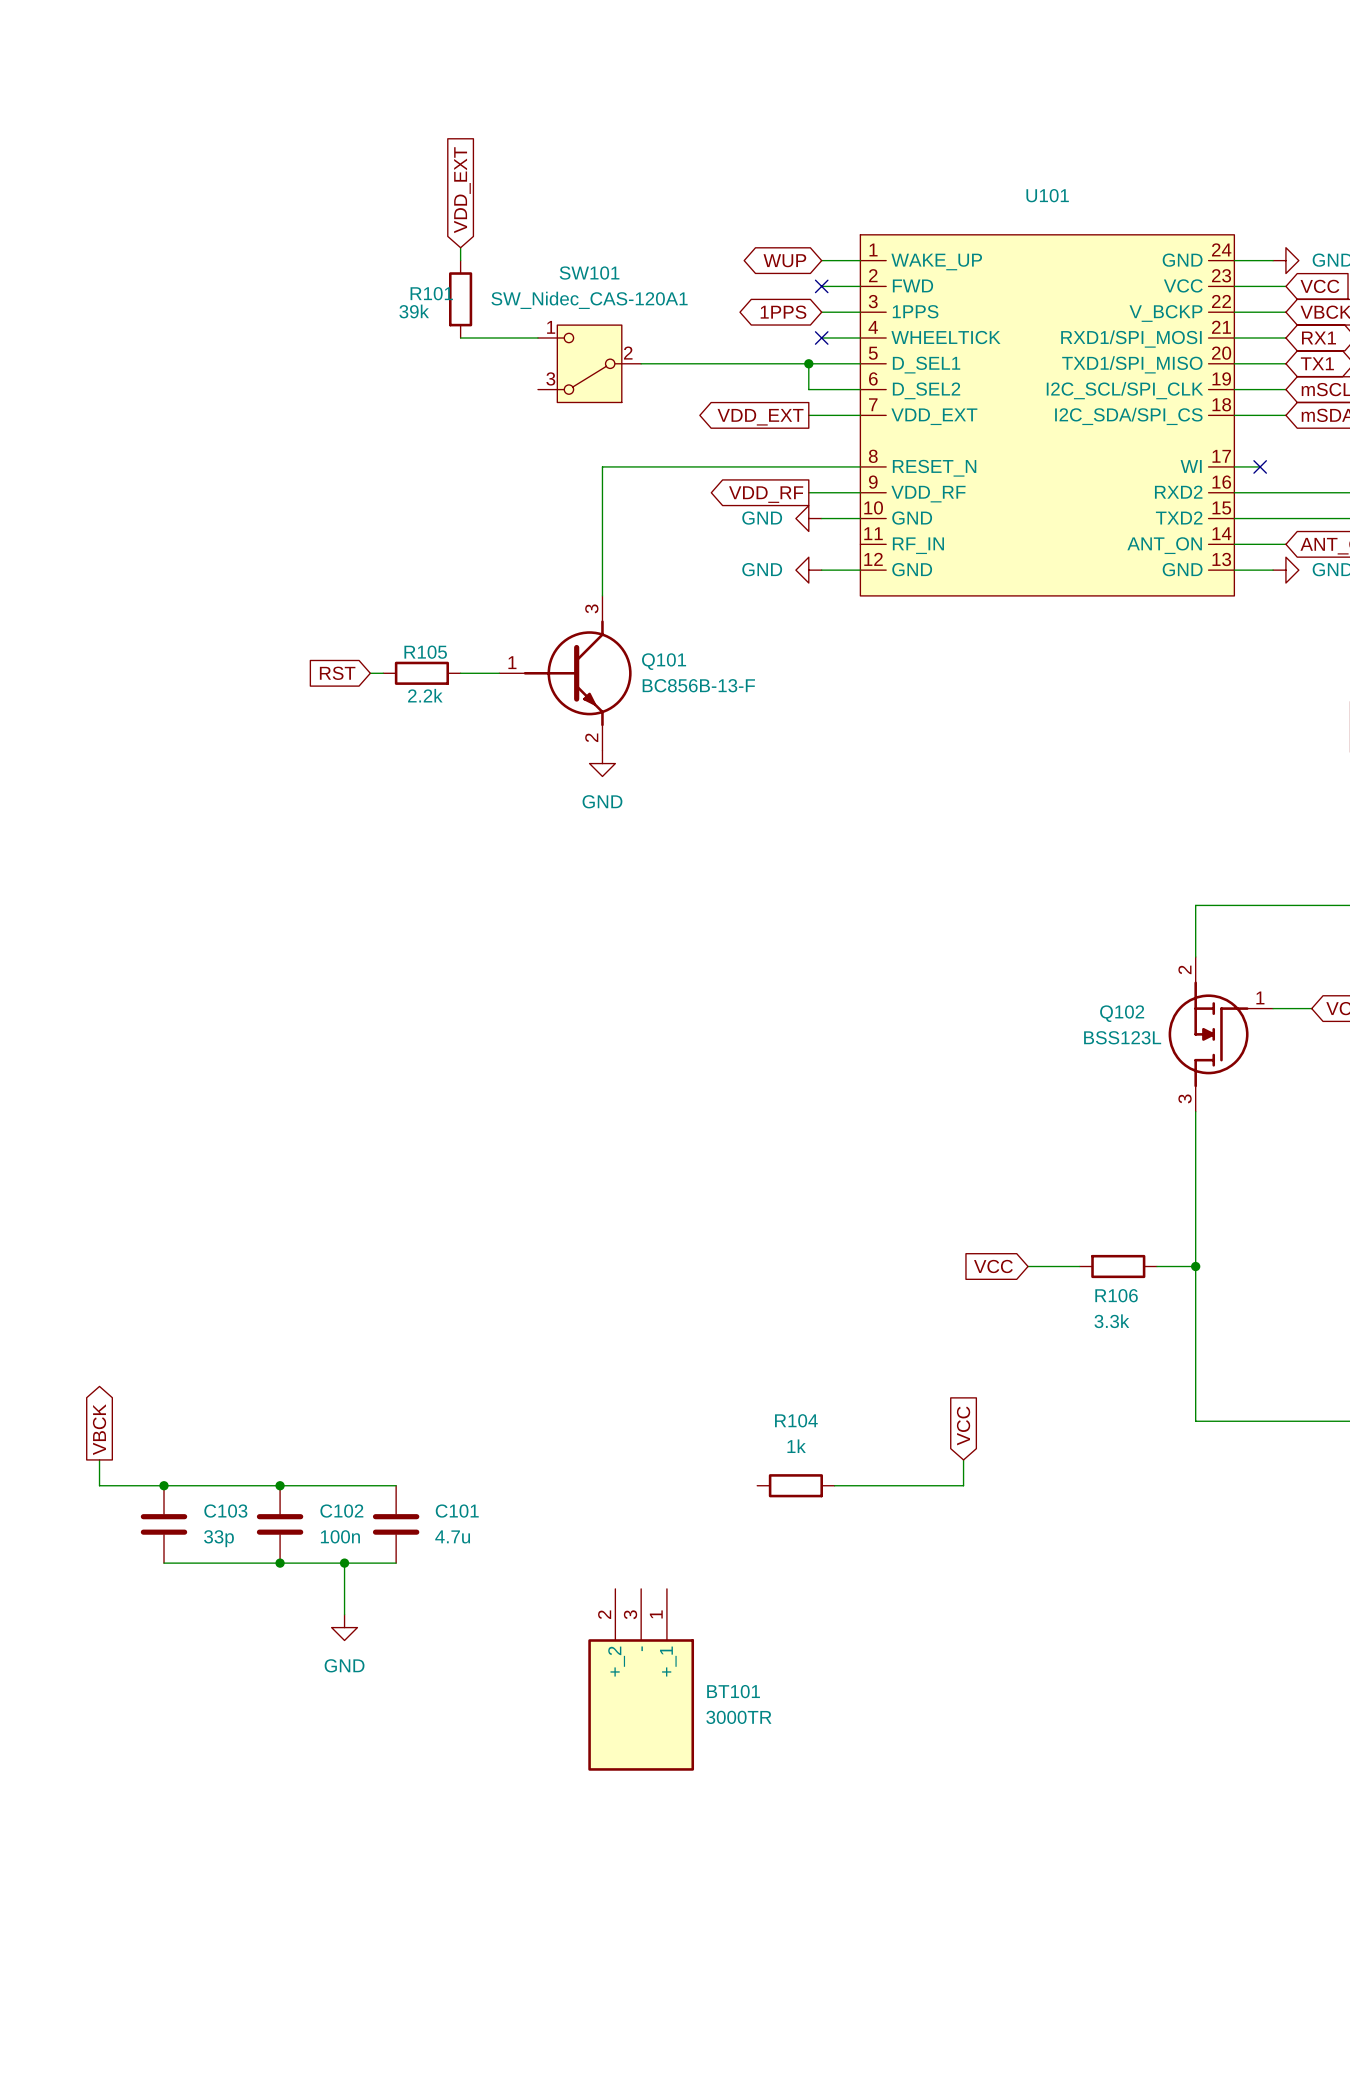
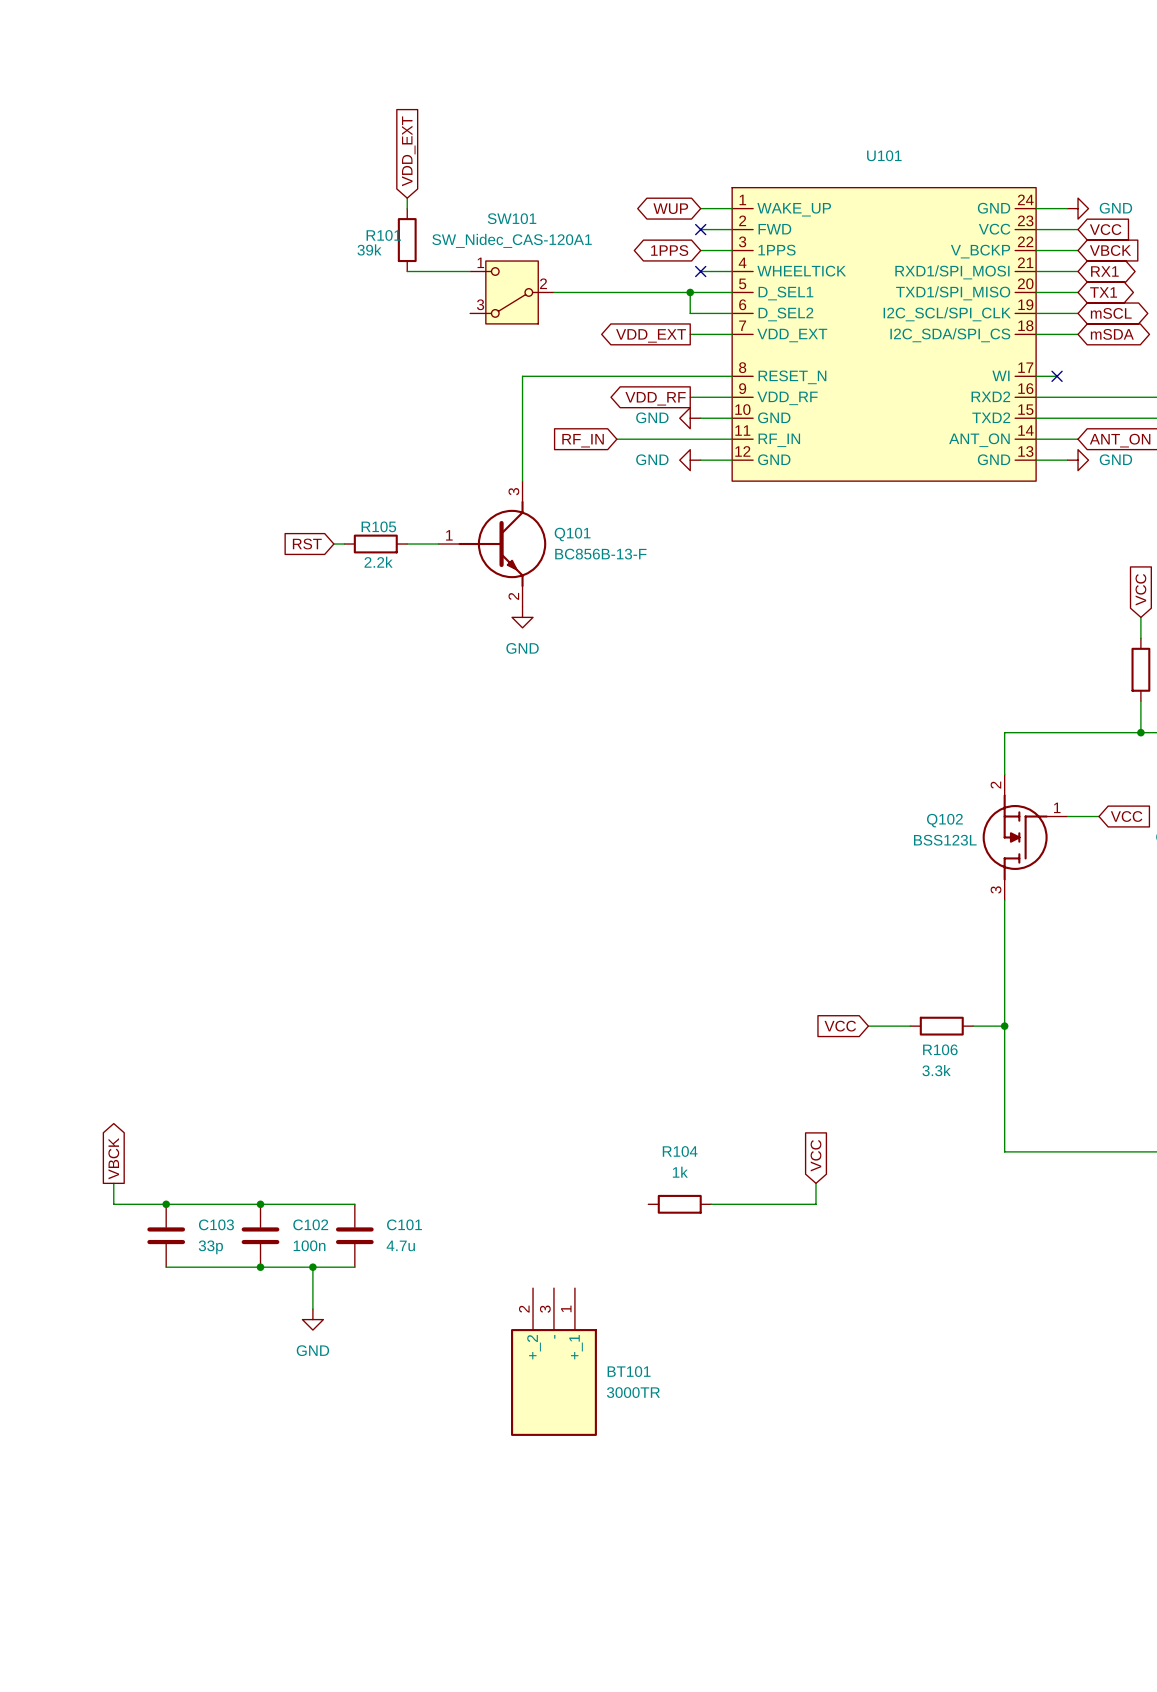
wire: none -> (616, 439) (732, 439)
global label: none -> RF_IN (583, 440)

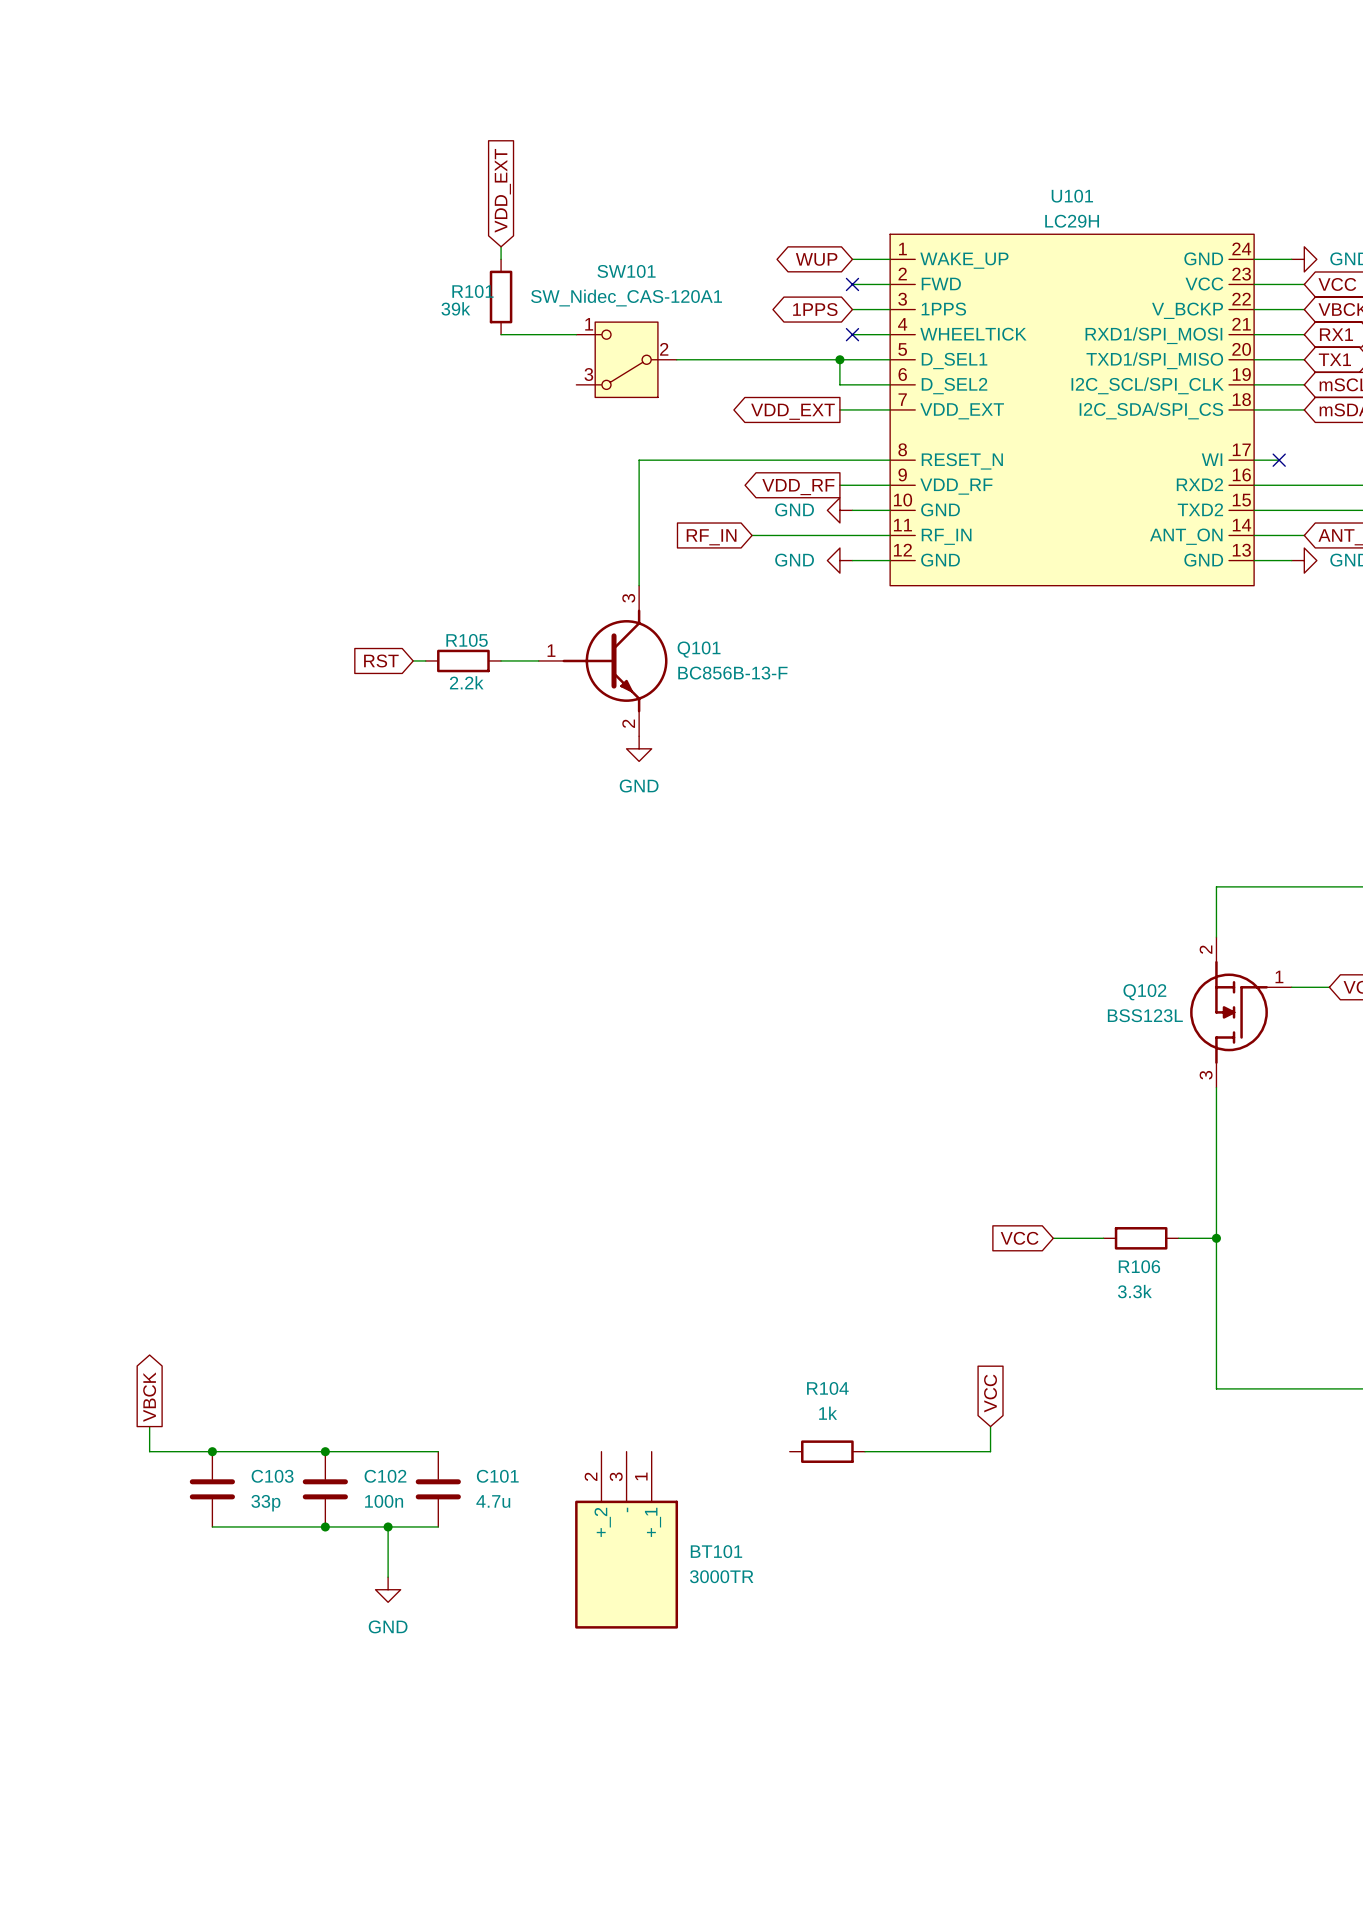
U101 value: none -> LC29H (1072, 221)
BT101 position: (553, 1362) -> (626, 1540)

